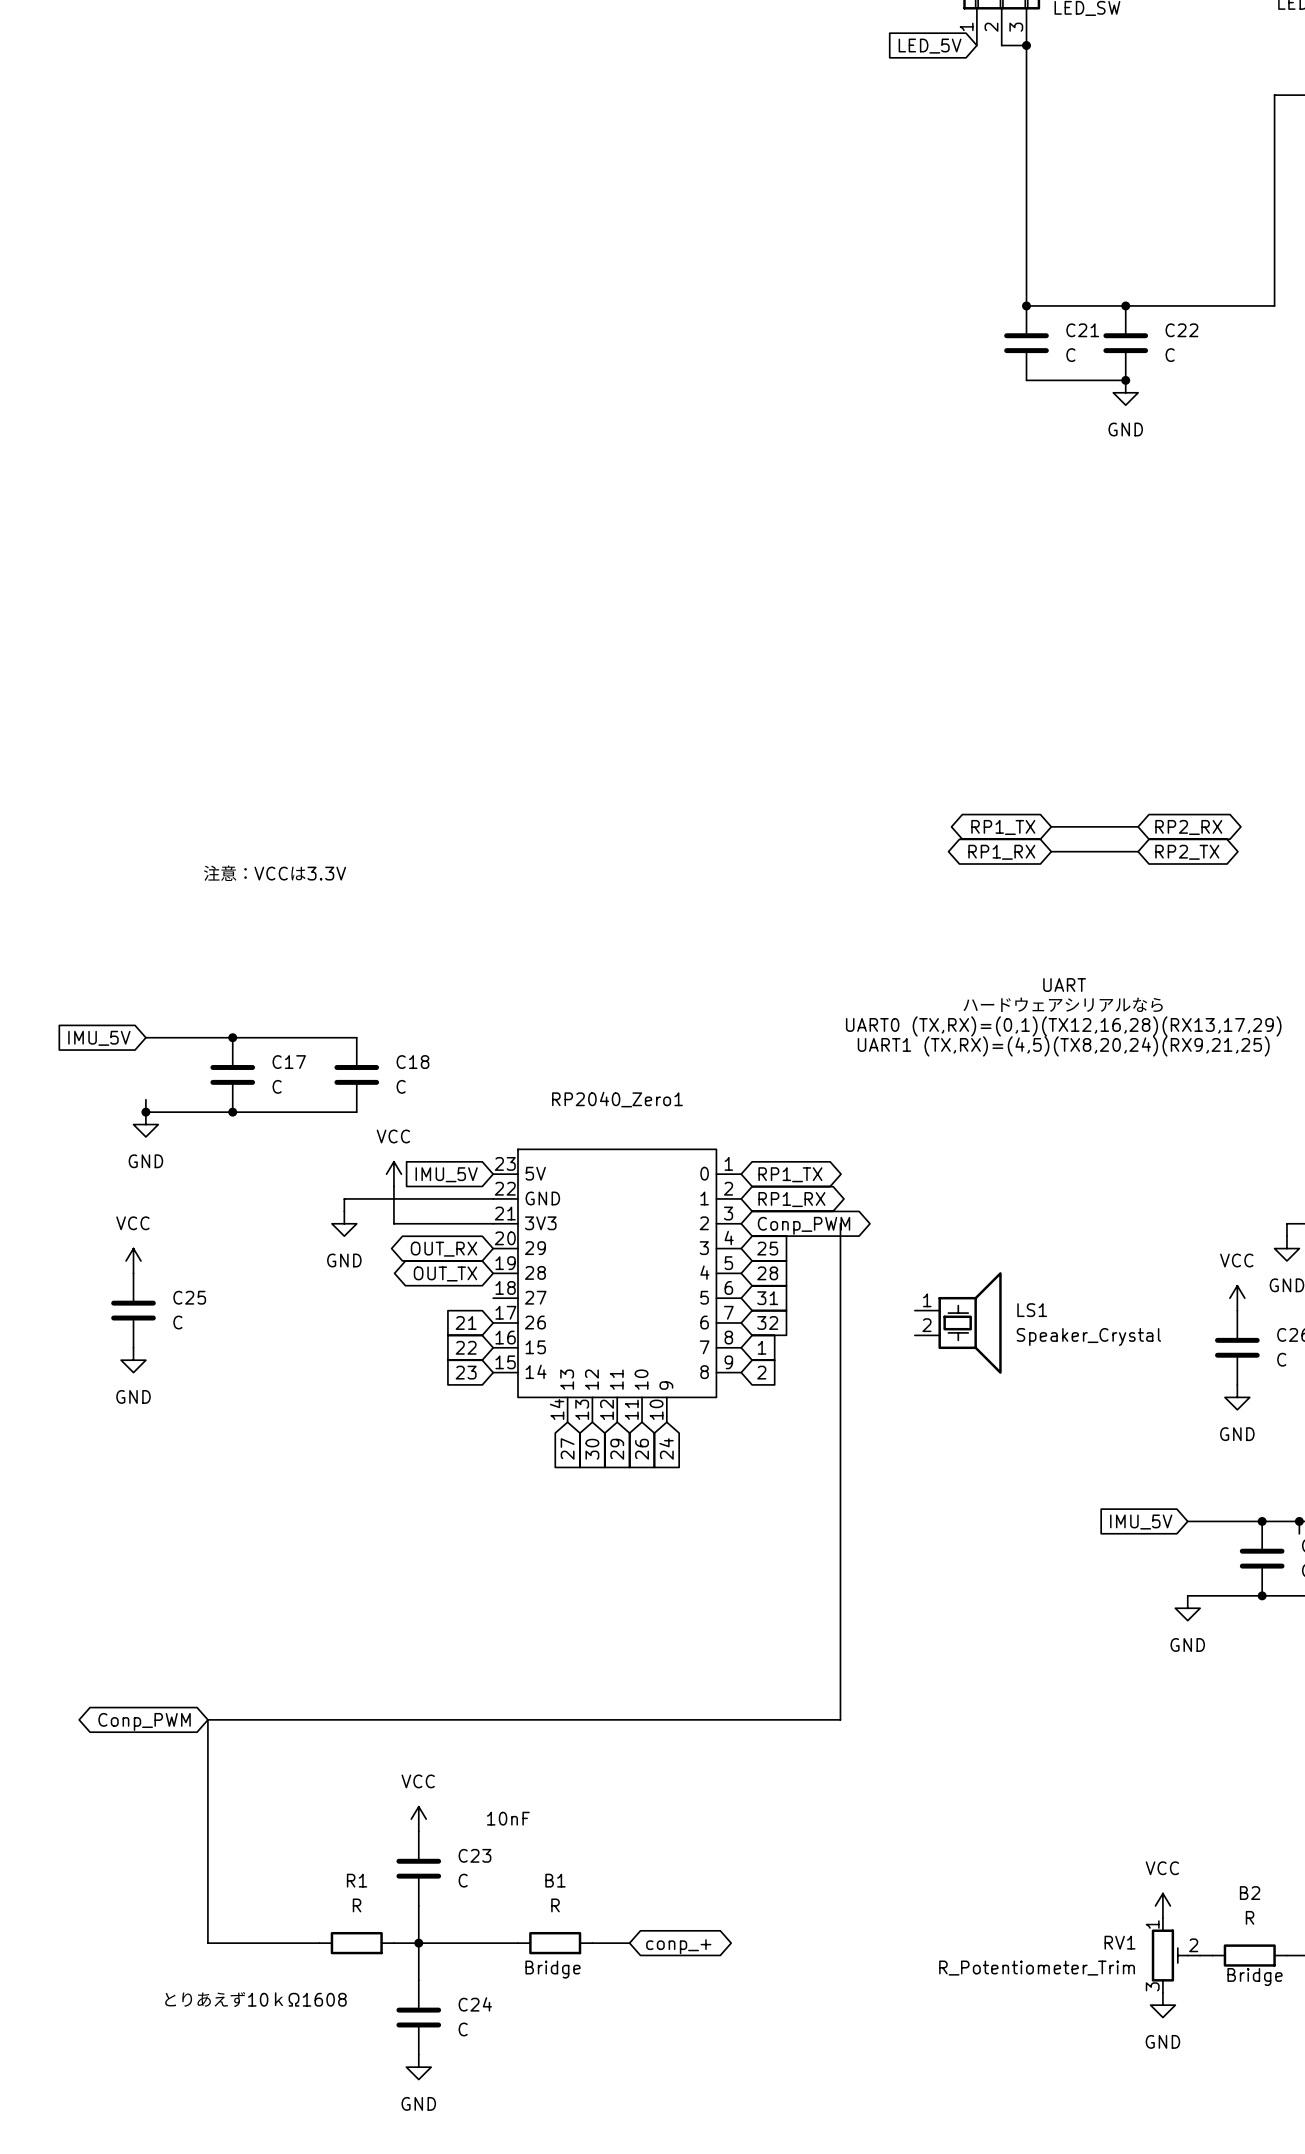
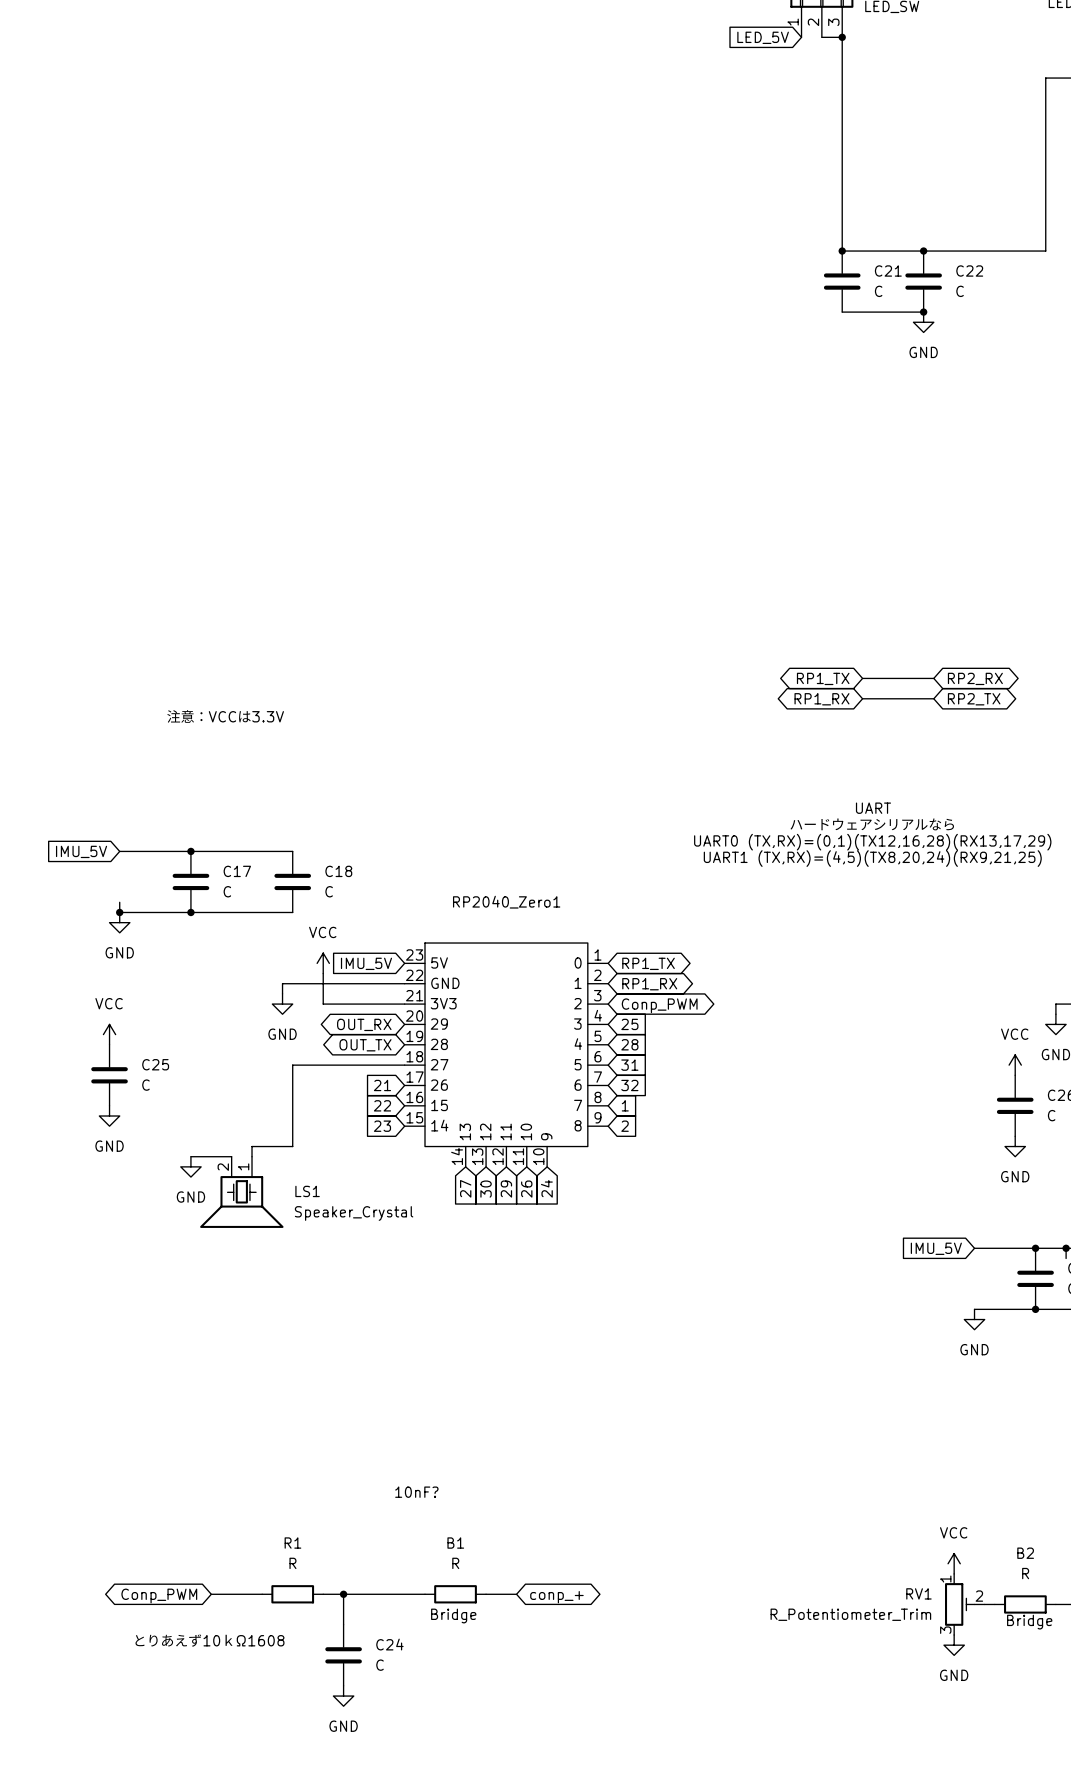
wire: (840, 1223) (840, 1719) (207, 1719) (207, 1943) (257, 1943) -> none
wire: none -> (404, 1065) (292, 1065) (292, 1146) (252, 1146) (252, 1156)
LS1 position: (958, 1322) -> (241, 1192)
LS1 rotation: 0° (970, 1322) -> 90° clockwise (241, 1201)
wire: none -> (190, 1156) (231, 1156)
power symbol: none -> GND (190, 1166)
global label position: Conp_PWM (144, 1721) -> Conp_PWM (159, 1595)
text: 10nF (508, 1818) -> 10nF? (416, 1492)
power symbol: VCC (418, 1819) -> none
C23: C (418, 1868) -> none
wire: (418, 1905) (418, 1943) -> none

